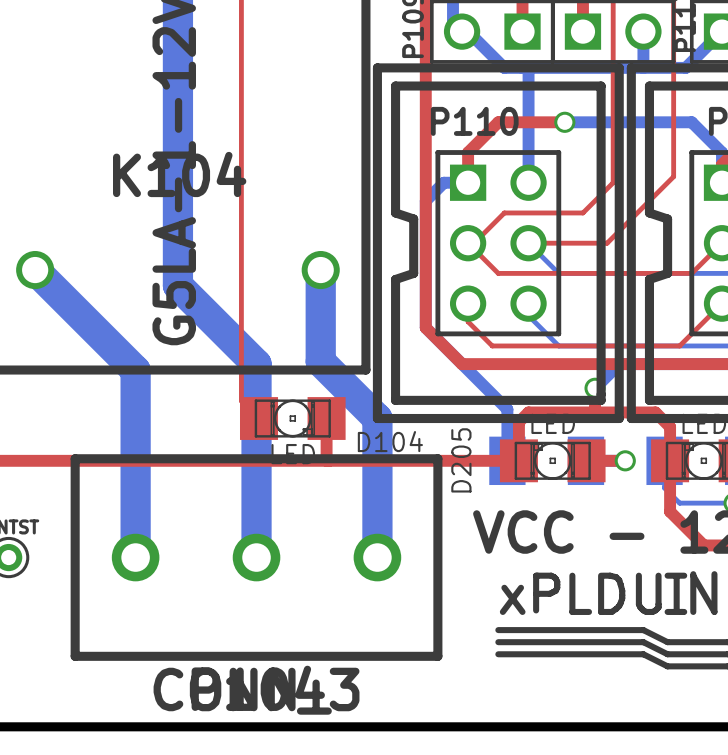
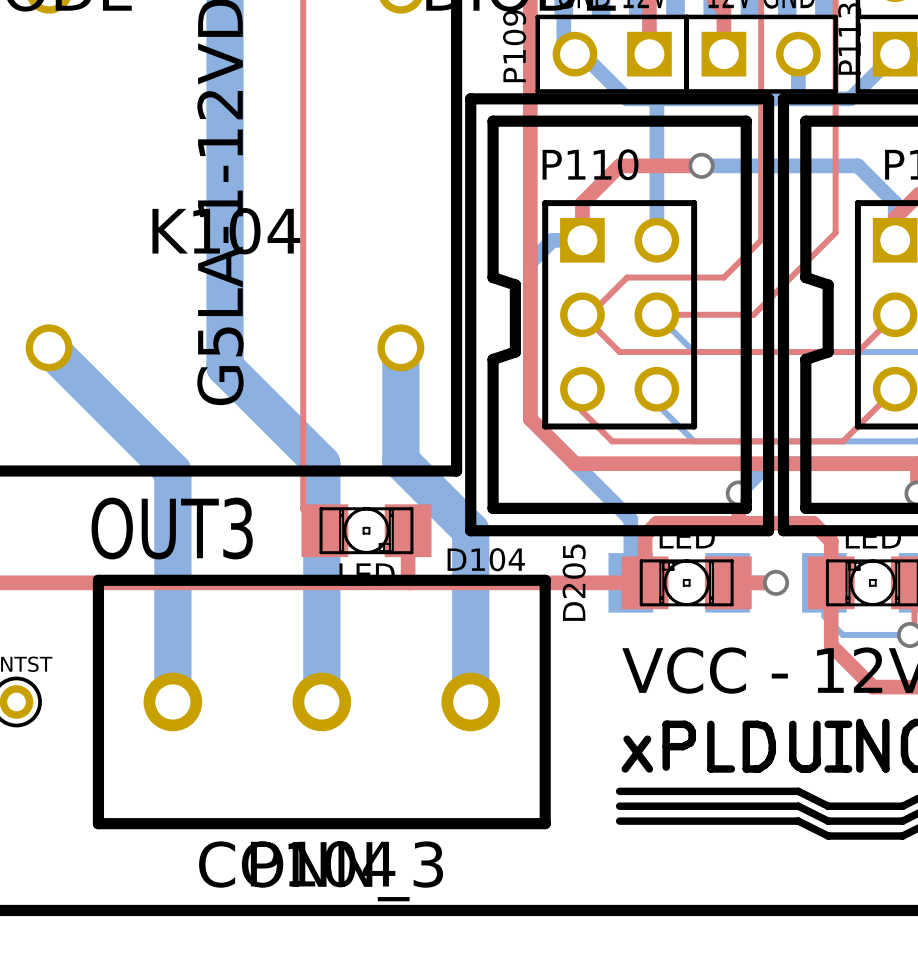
text: none -> OUT3 (172, 528)

